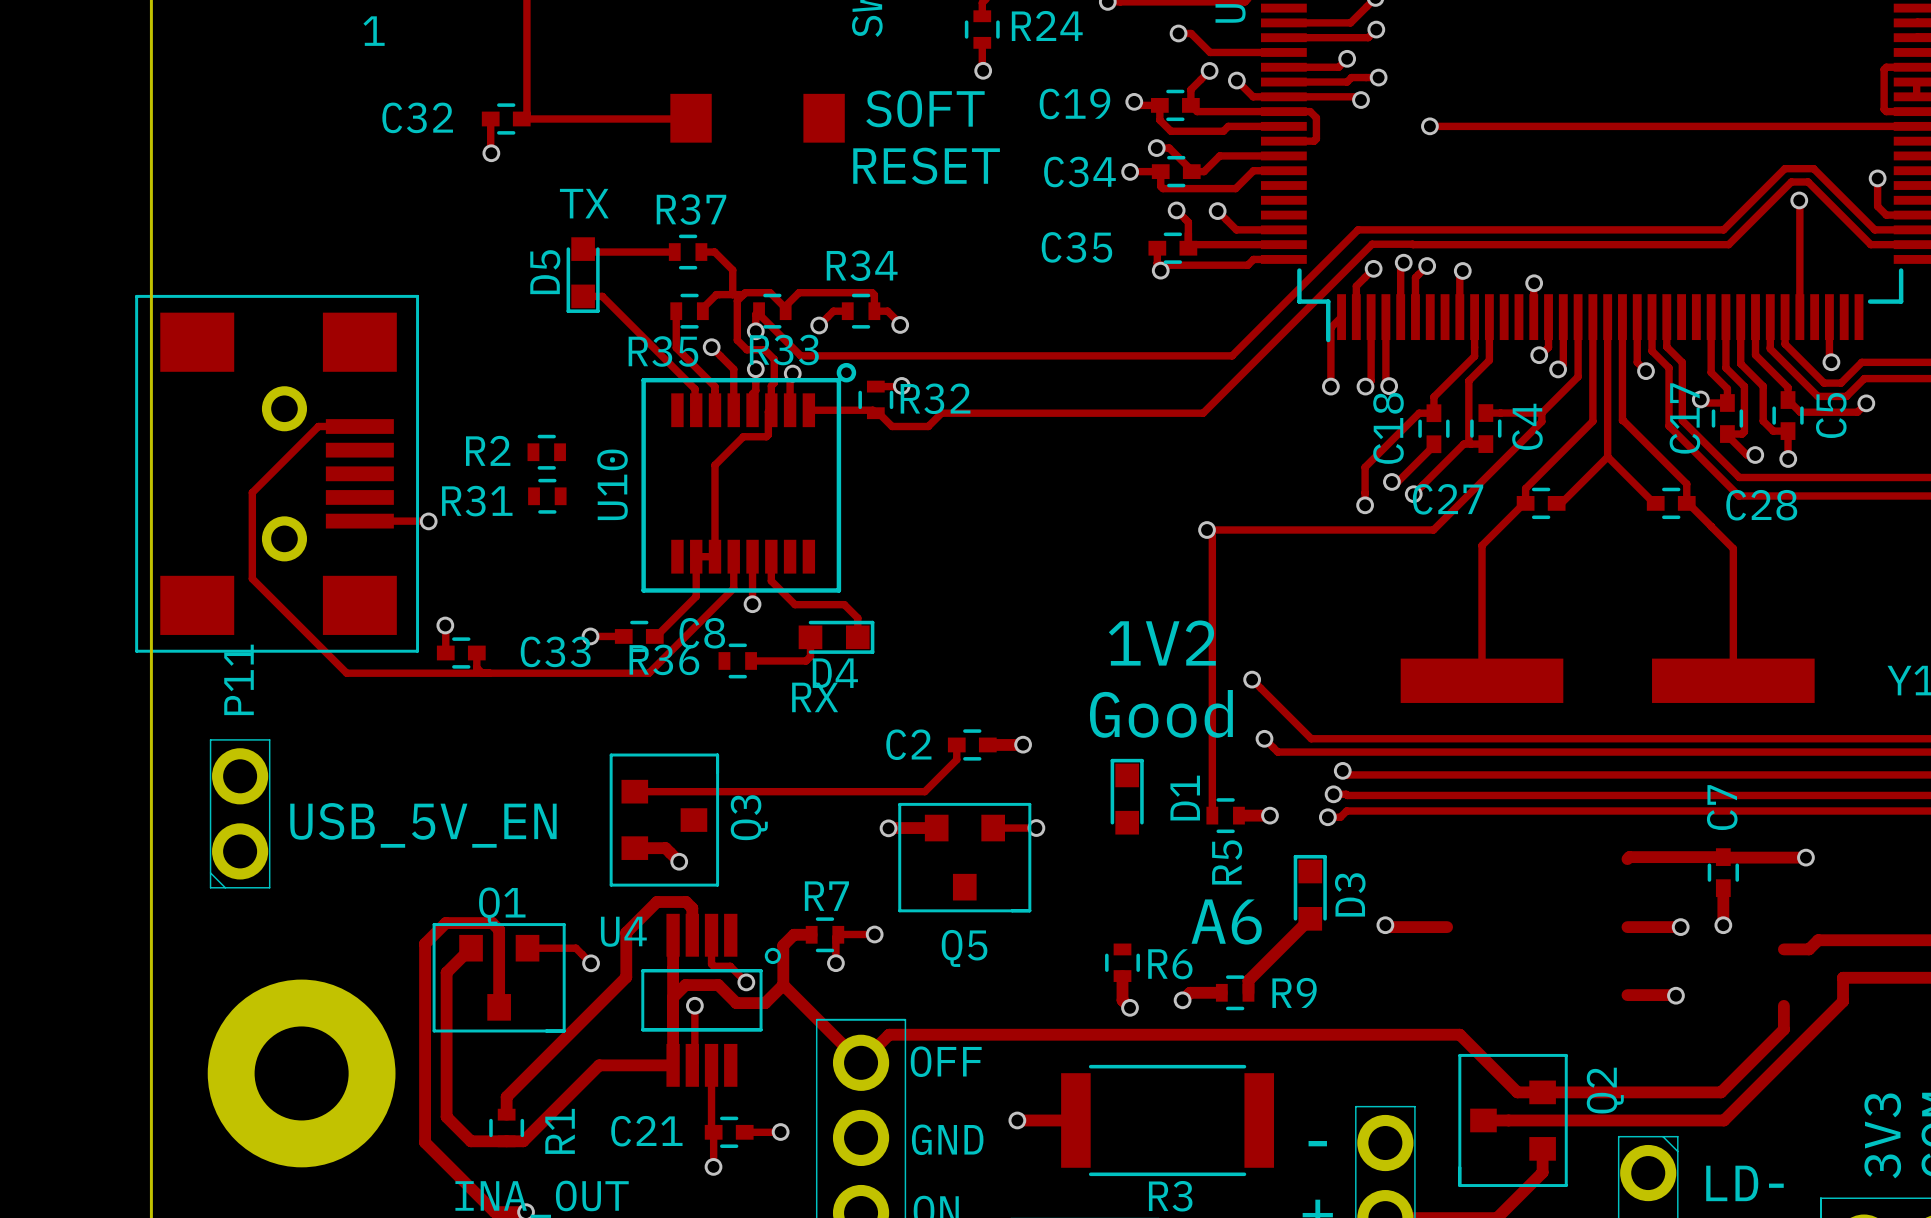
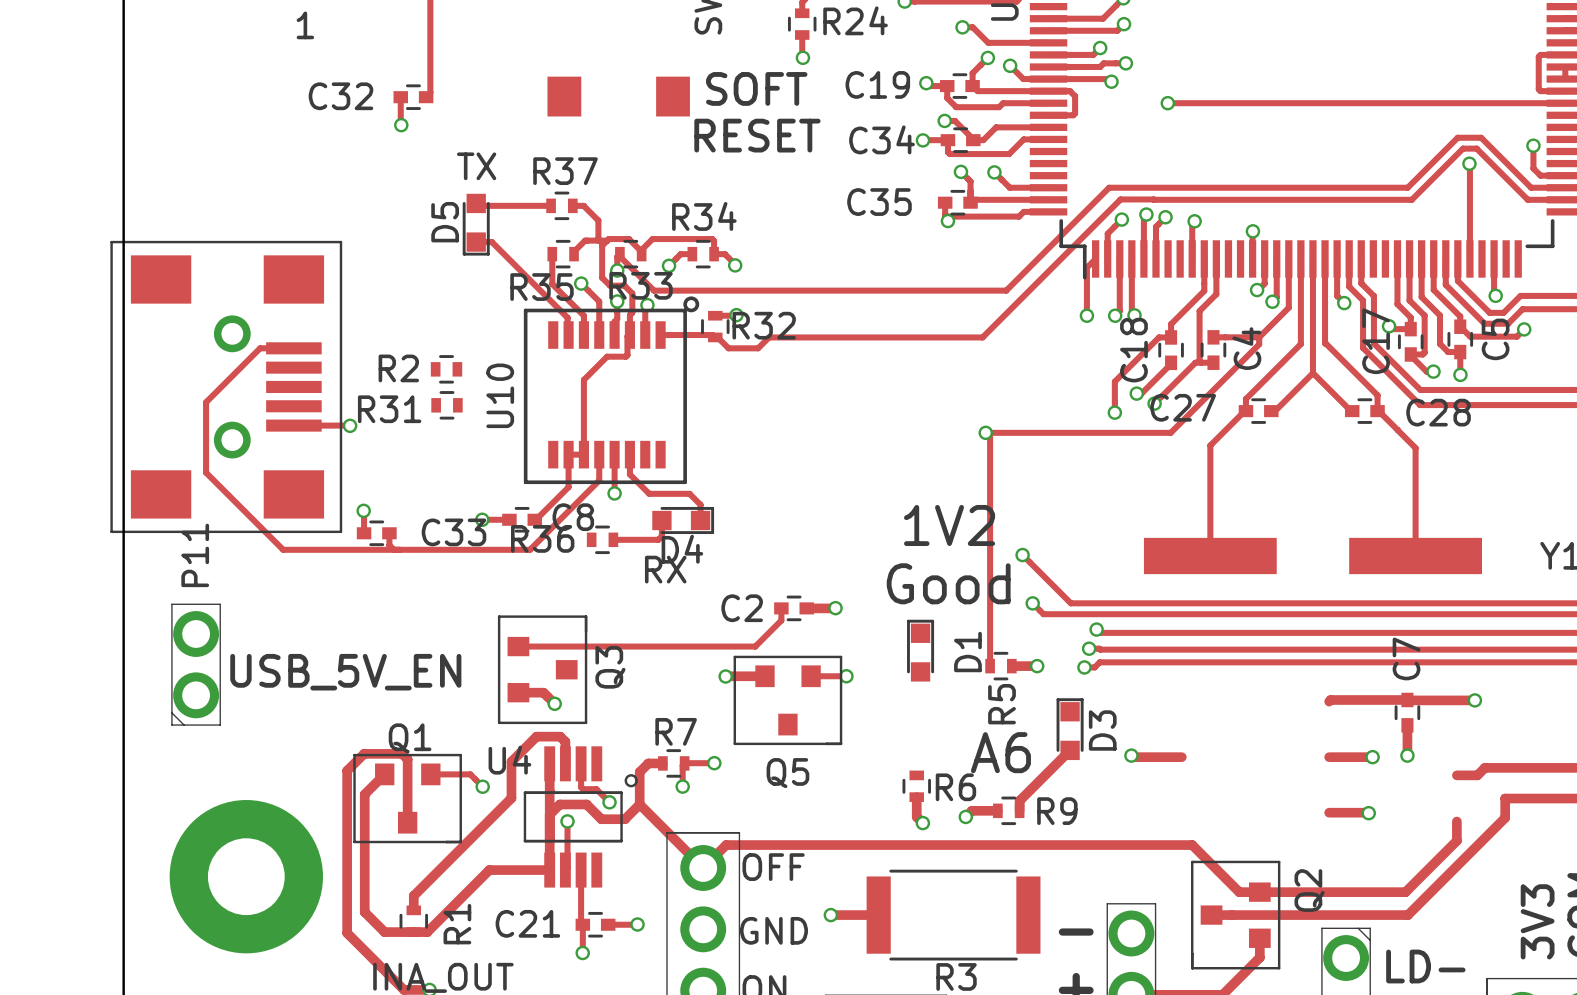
track: (691, 118) (521, 118) -> none

